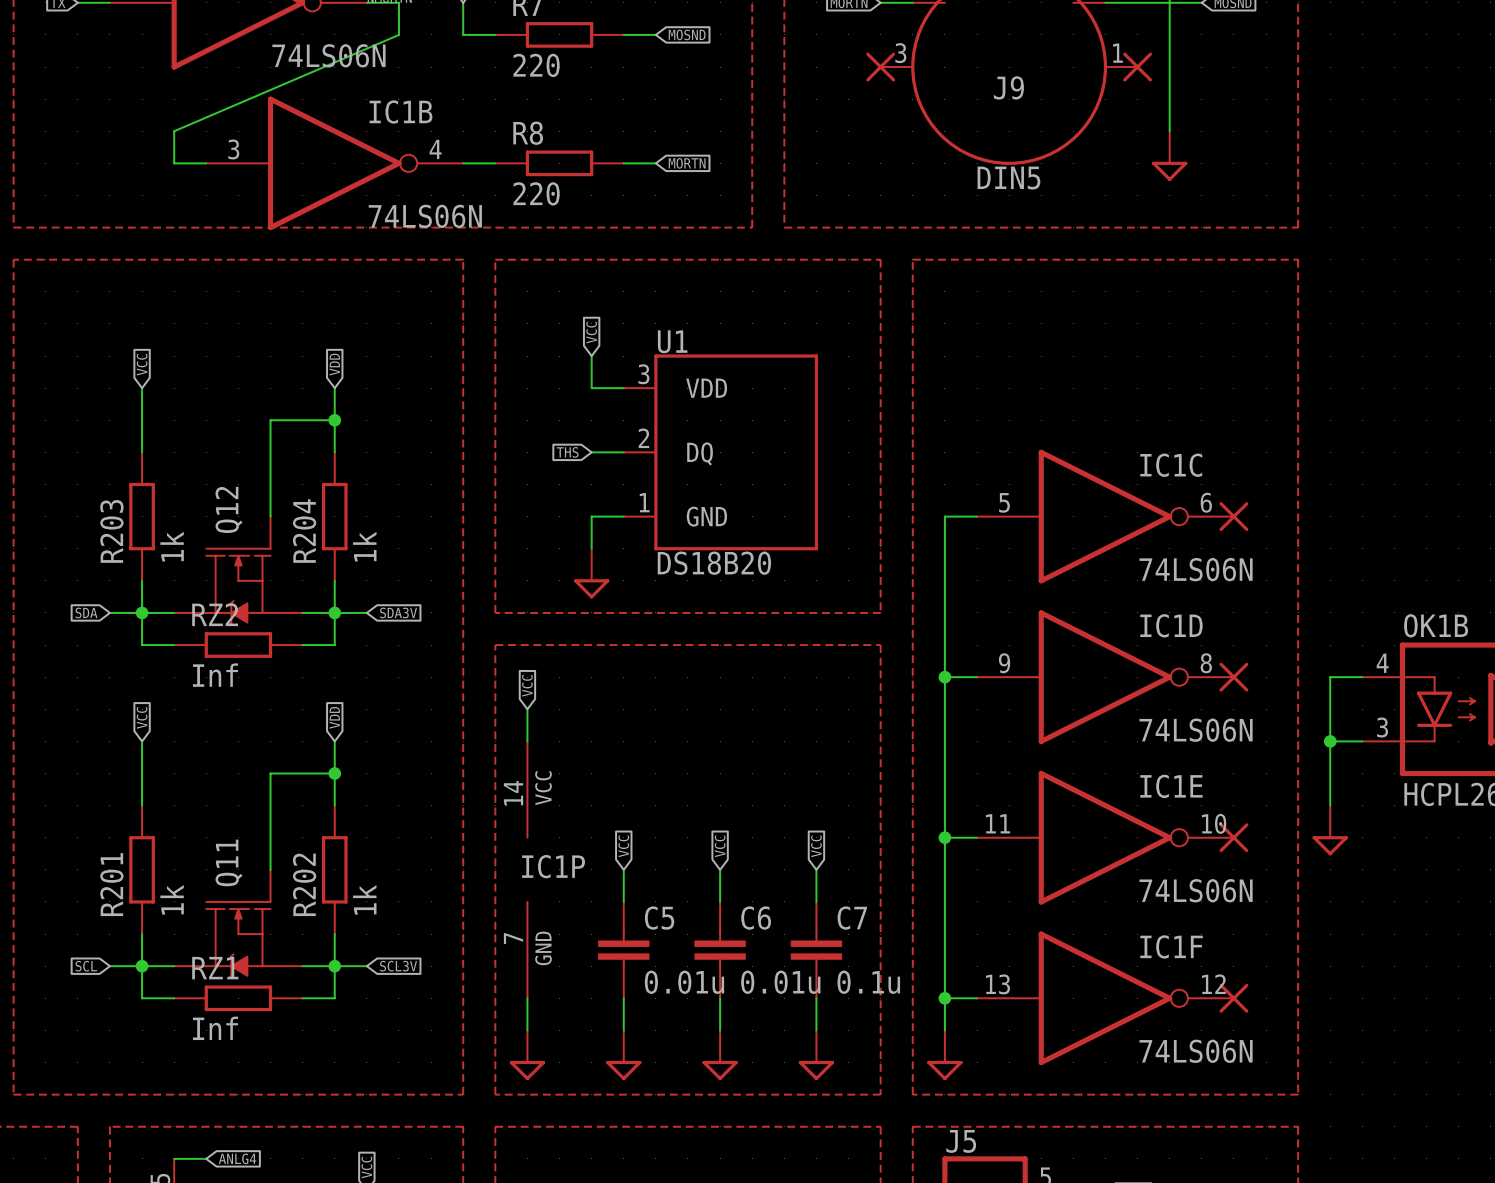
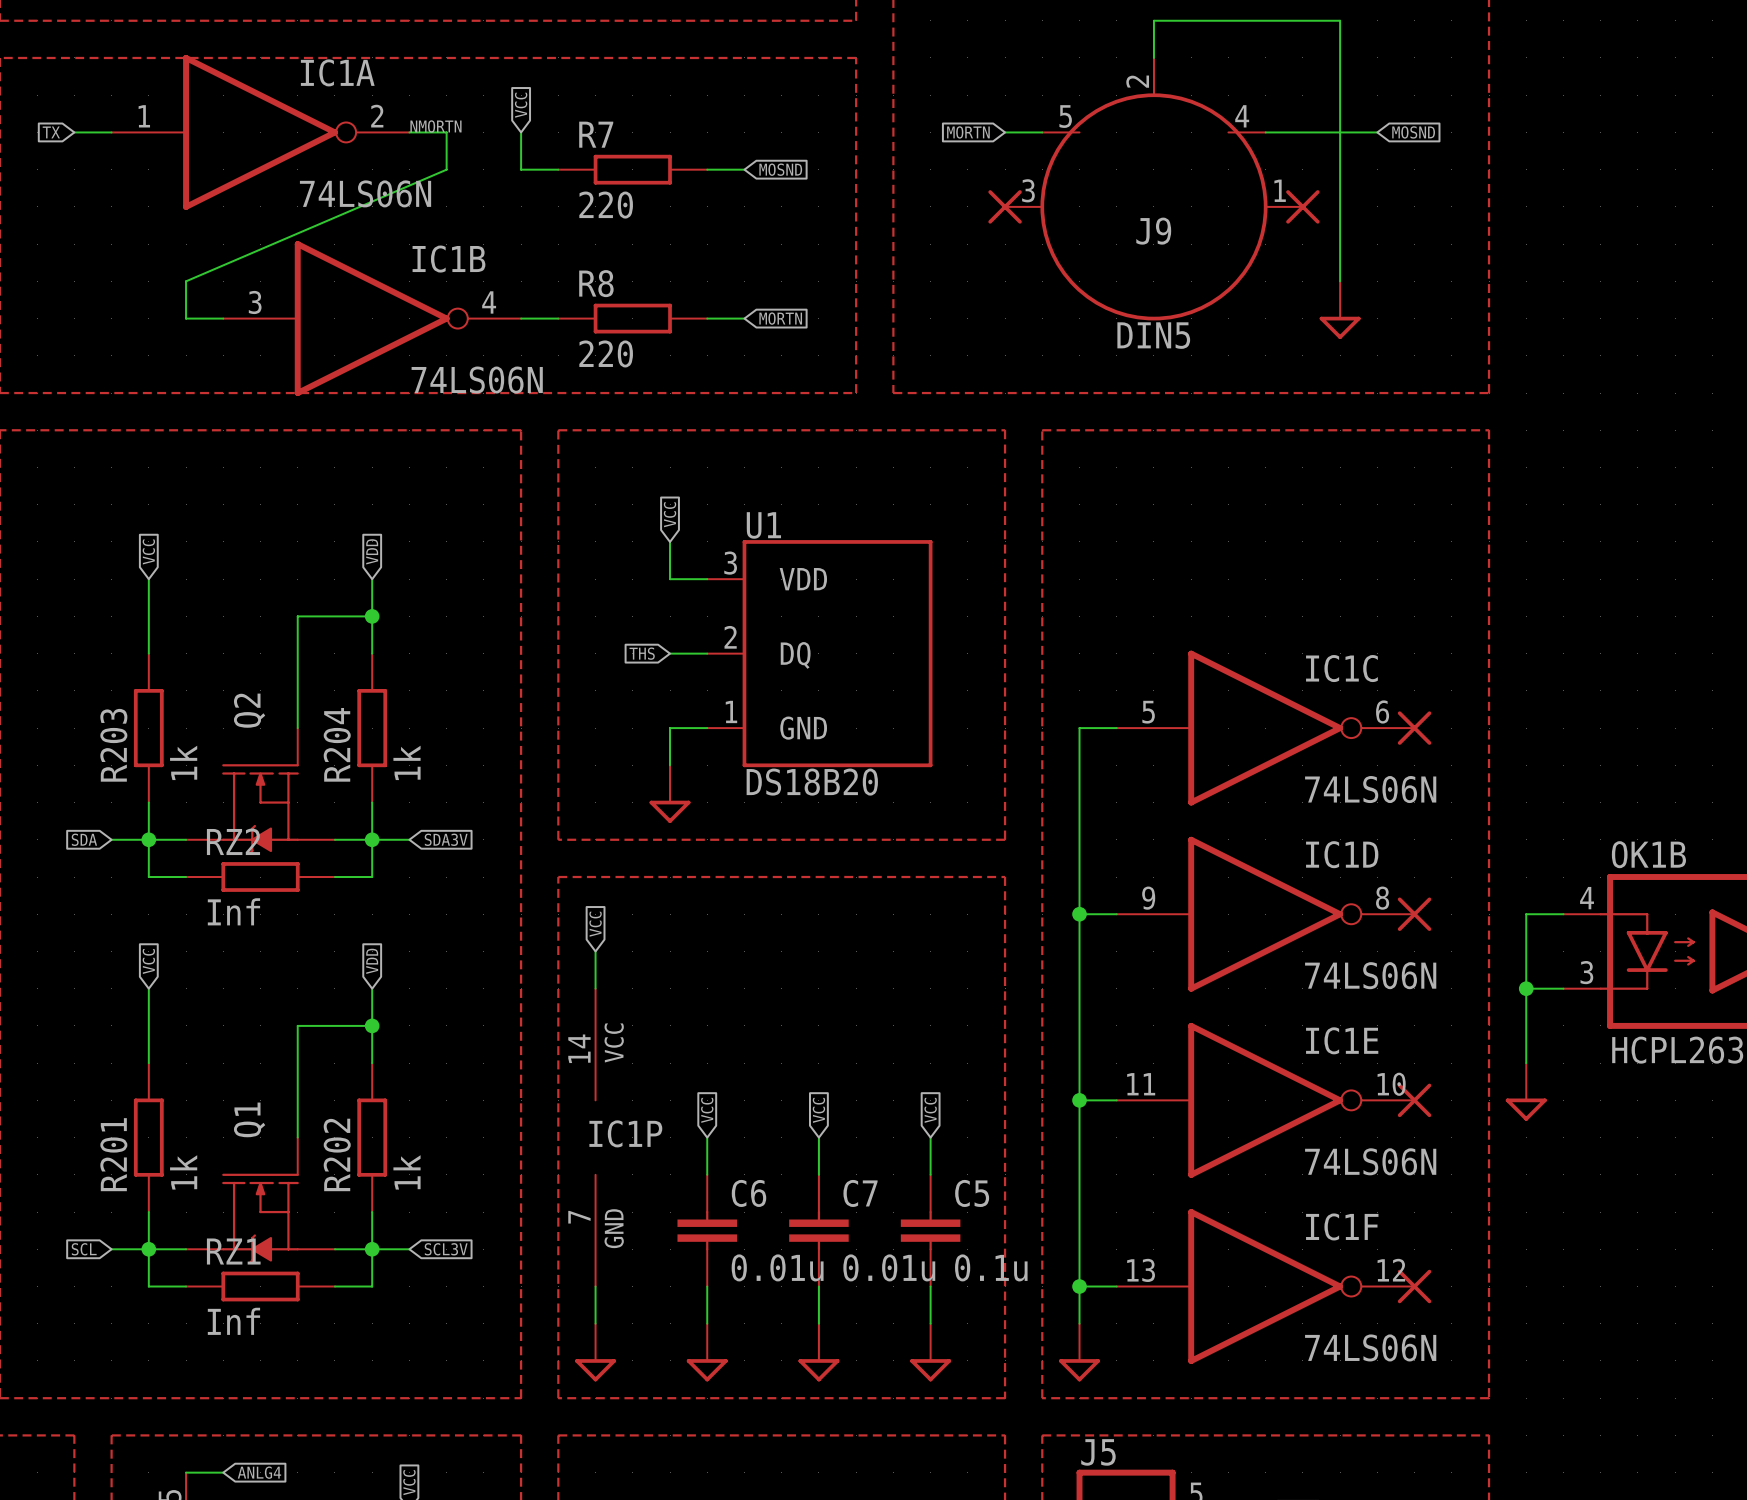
Q12 name: Q12 (229, 509) -> Q2 (249, 710)
Q11 name: Q11 (229, 862) -> Q1 (249, 1119)
C5 name: C5 (659, 918) -> C6 (748, 1193)
C6 name: C6 (756, 918) -> C7 (860, 1193)
C7 name: C7 (852, 918) -> C5 (972, 1193)

